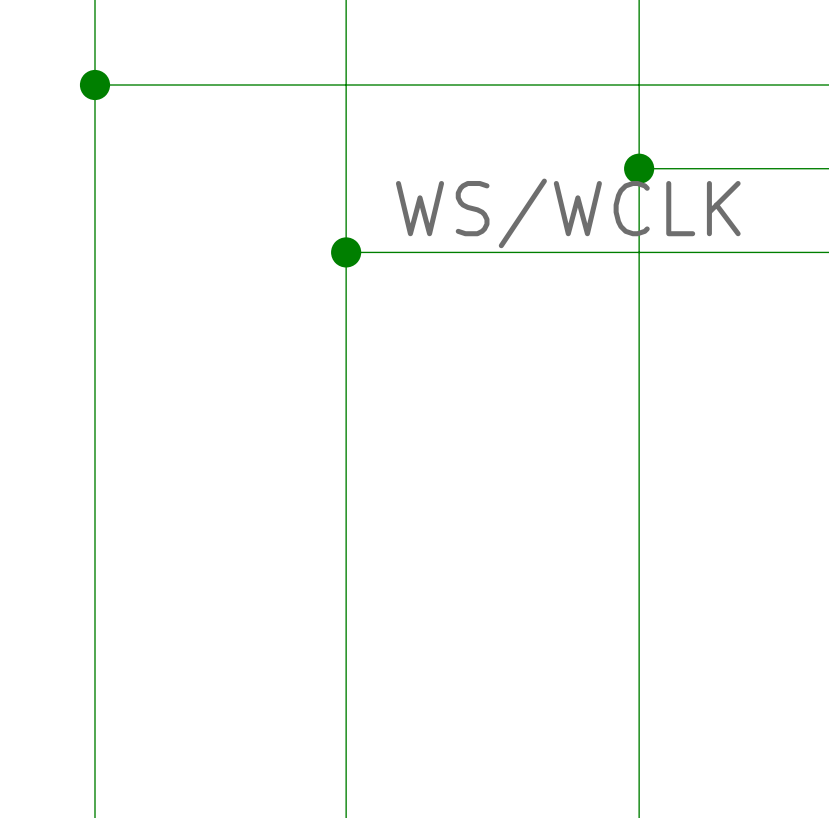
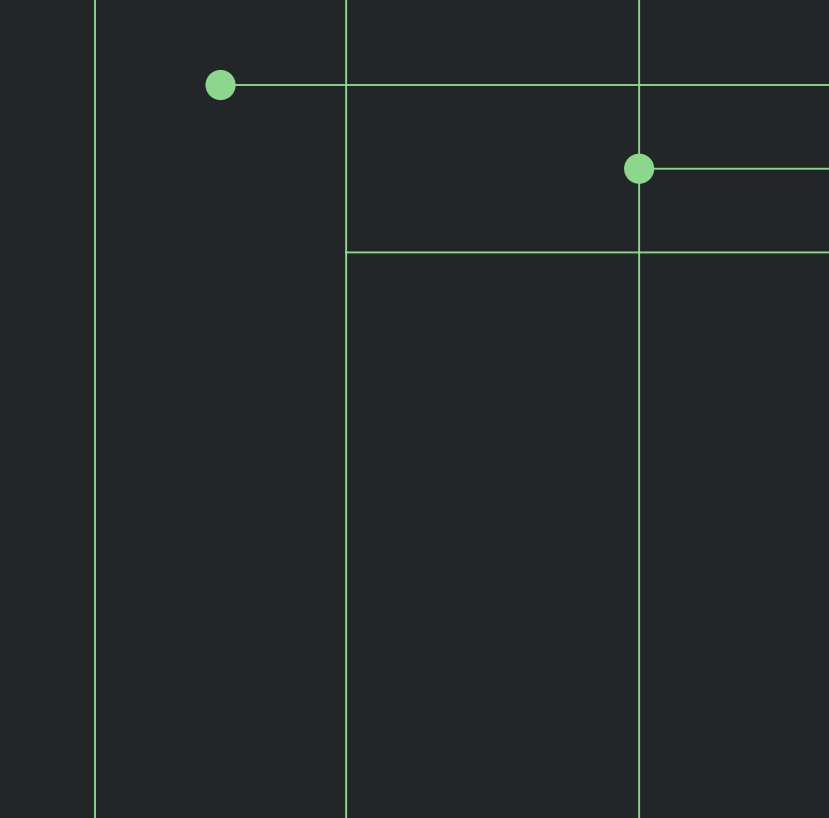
wire: (94, 85) (220, 85) -> none
junction: (94, 85) -> none
junction: none -> (220, 85)
label: WS/WCLK (568, 213) -> none
junction: (346, 252) -> none

